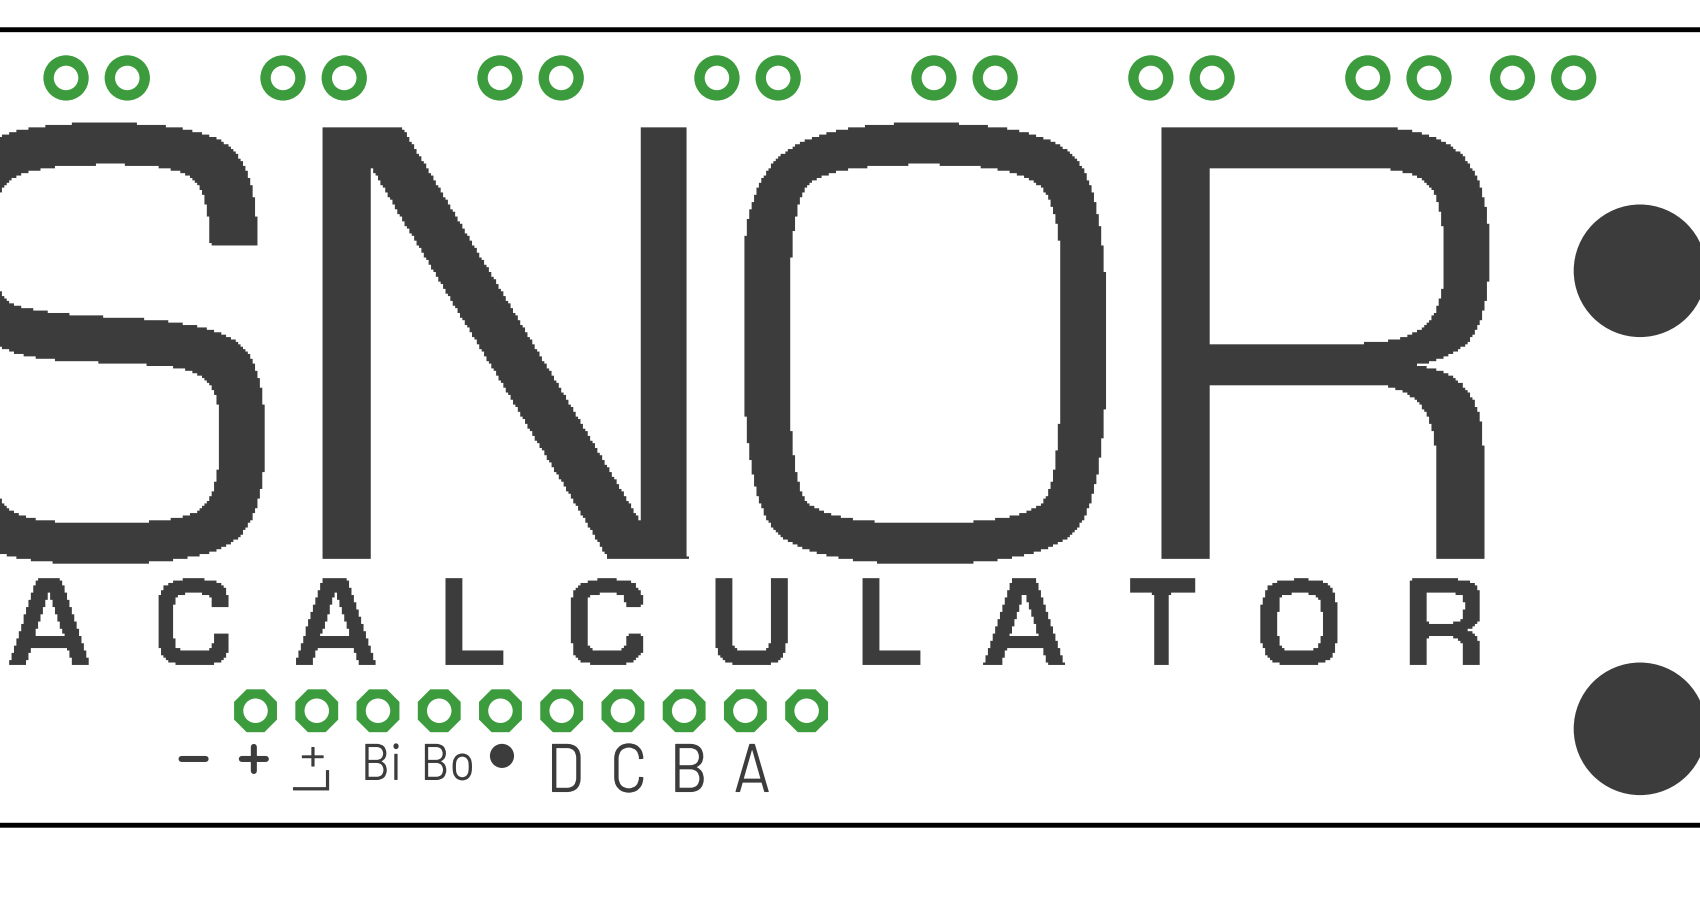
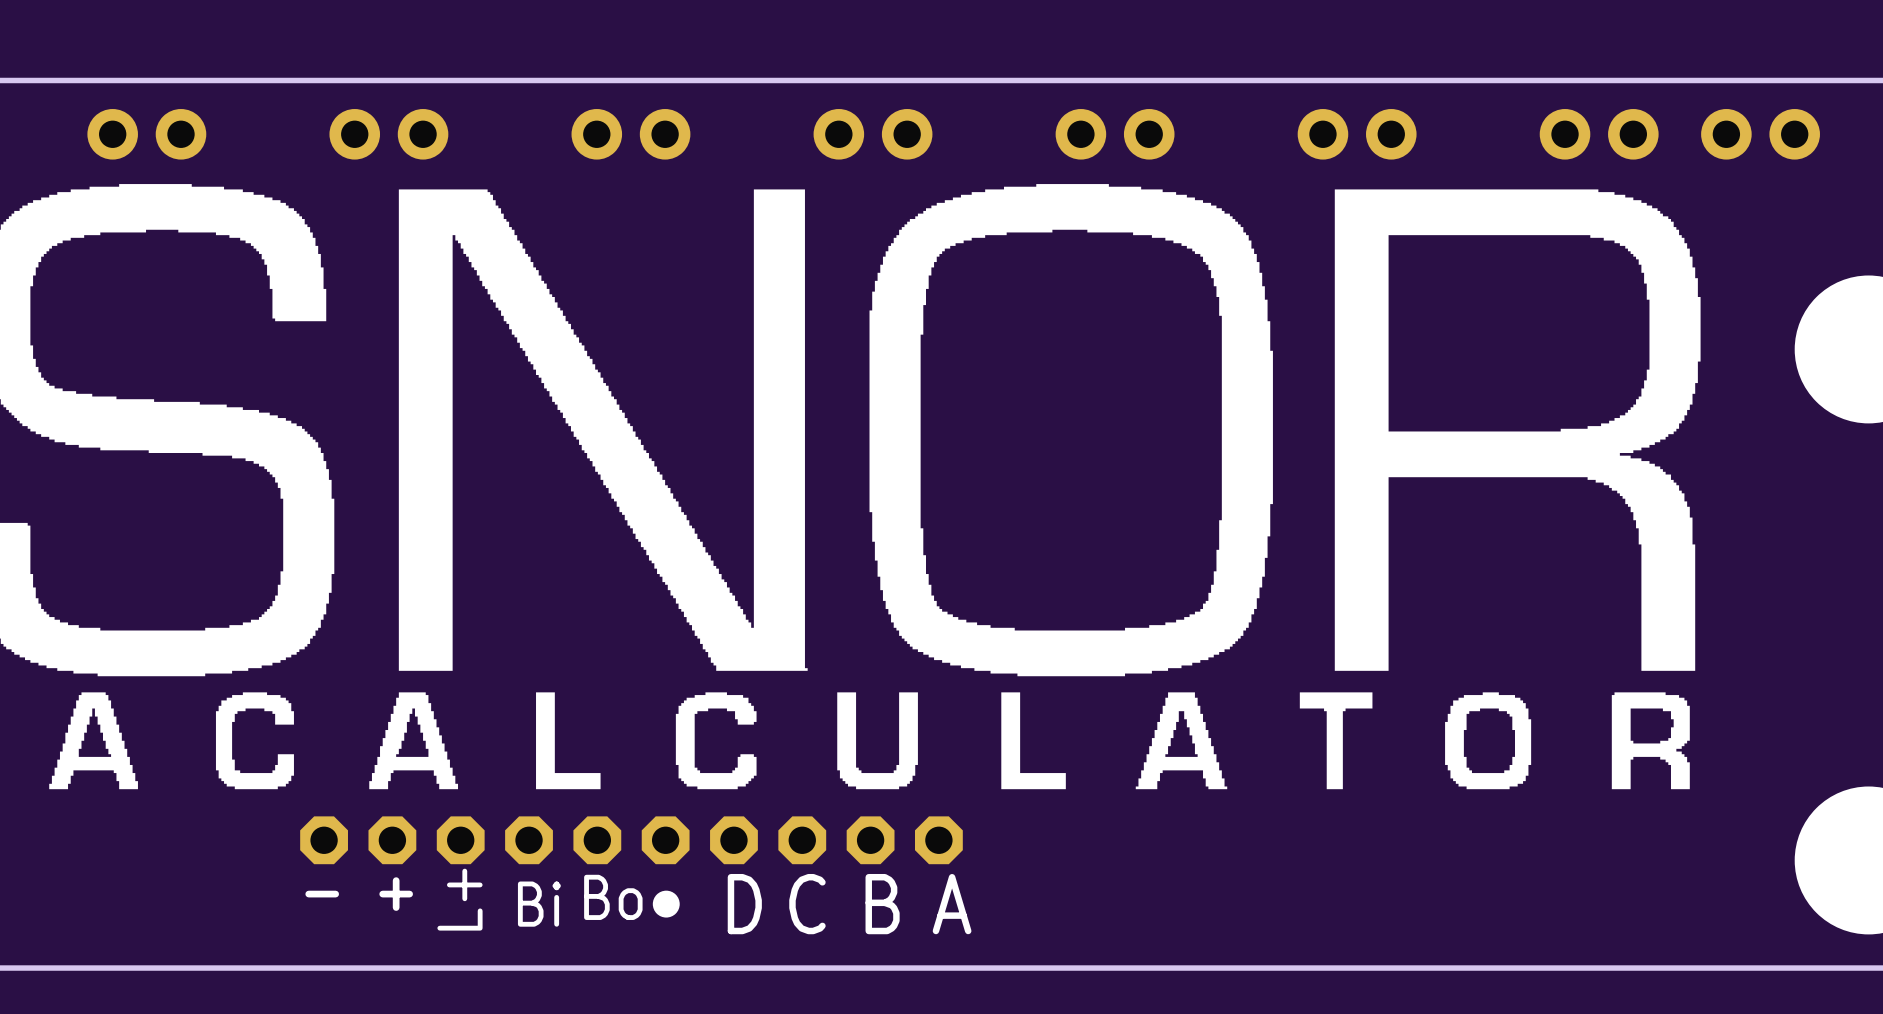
line: (253, 746) (253, 771) -> (396, 880) (396, 907)
drawing position: (501, 755) -> (666, 904)
line: (205, 758) (181, 758) -> (409, 894) (382, 894)
text: Bi (381, 761) -> none
text: Bo (448, 762) -> Bi (539, 904)
text: none -> Bo (613, 897)
text: D (566, 767) -> none
text: C (628, 767) -> D (744, 904)
text: B (689, 767) -> C (807, 904)
text: A (752, 767) -> B (882, 904)
text: none -> A (952, 904)
text position: L+ (311, 768) -> L+ (459, 899)

